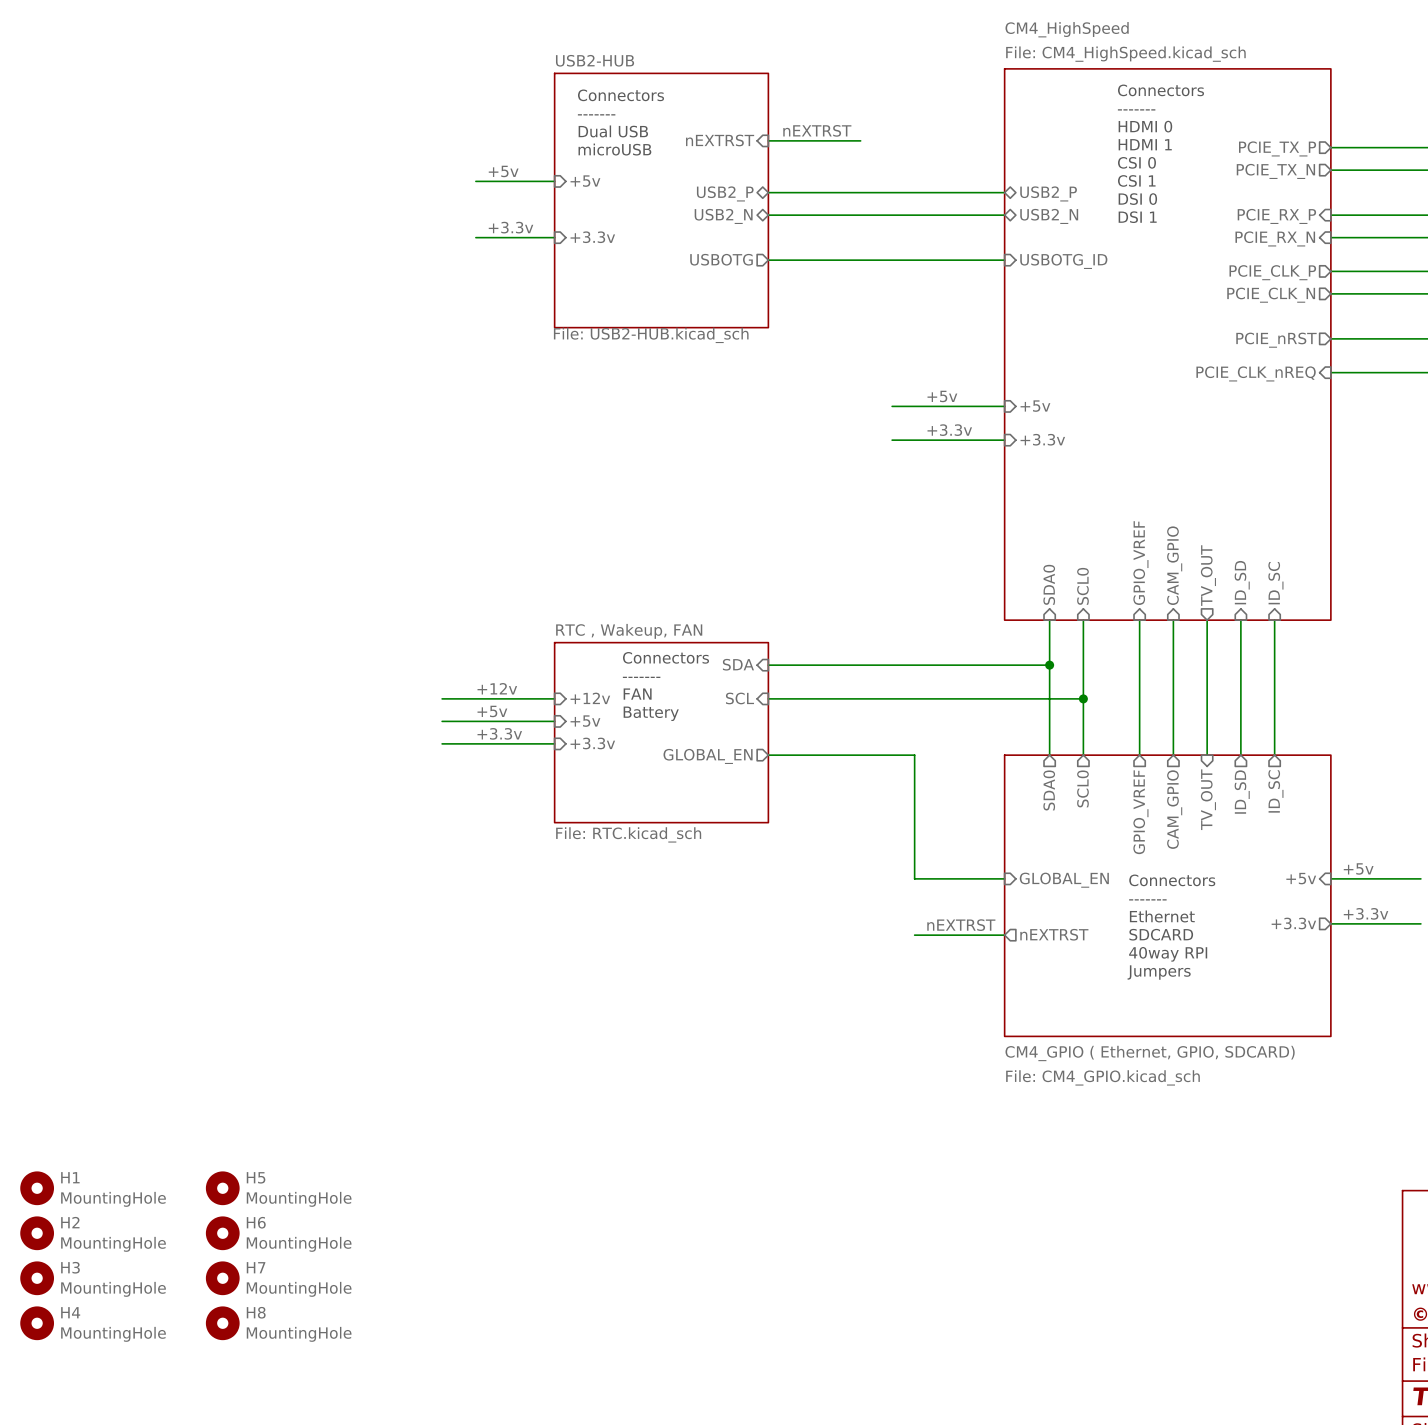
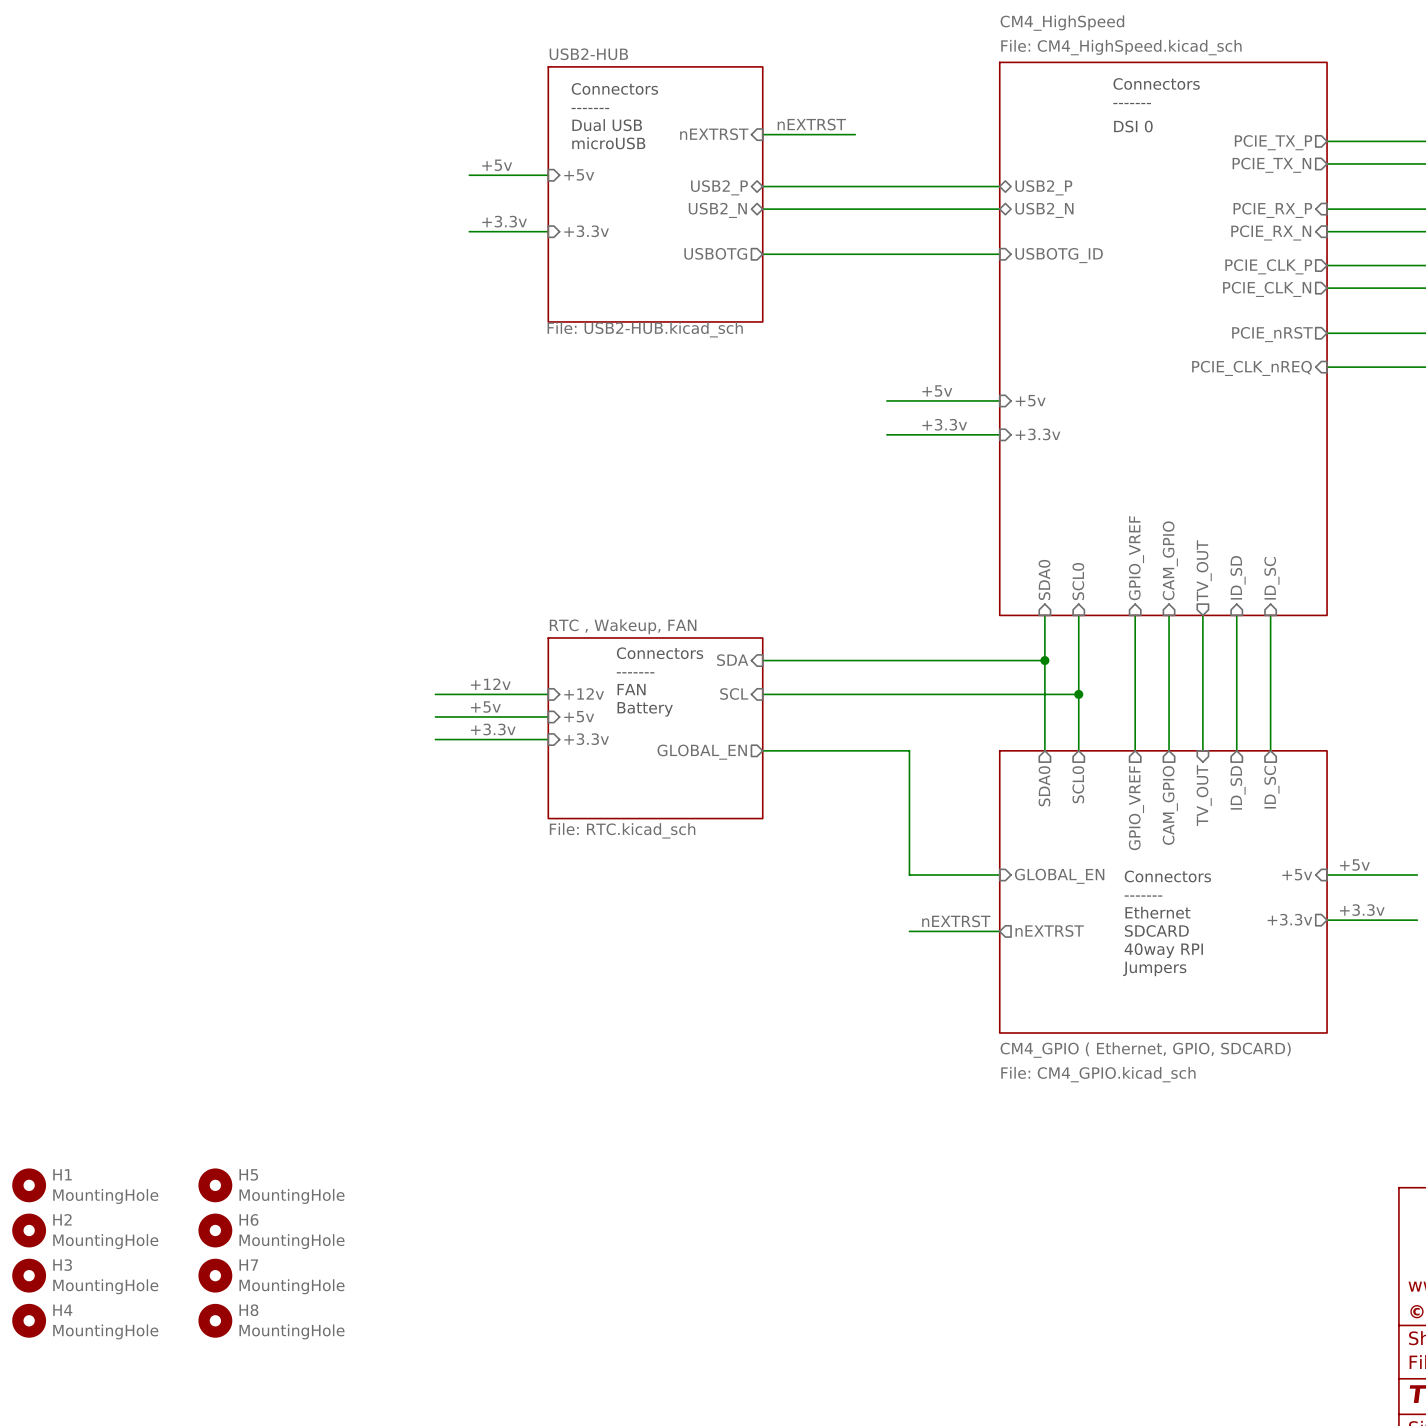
text: HDMI 0 (1145, 126) -> none
text: HDMI 1 (1145, 144) -> none
text: CSI 0 (1136, 162) -> none
text: CSI 1 (1136, 180) -> none
text position: DSI 0 (1137, 199) -> DSI 0 (1133, 126)
text: DSI 1 (1137, 217) -> none

